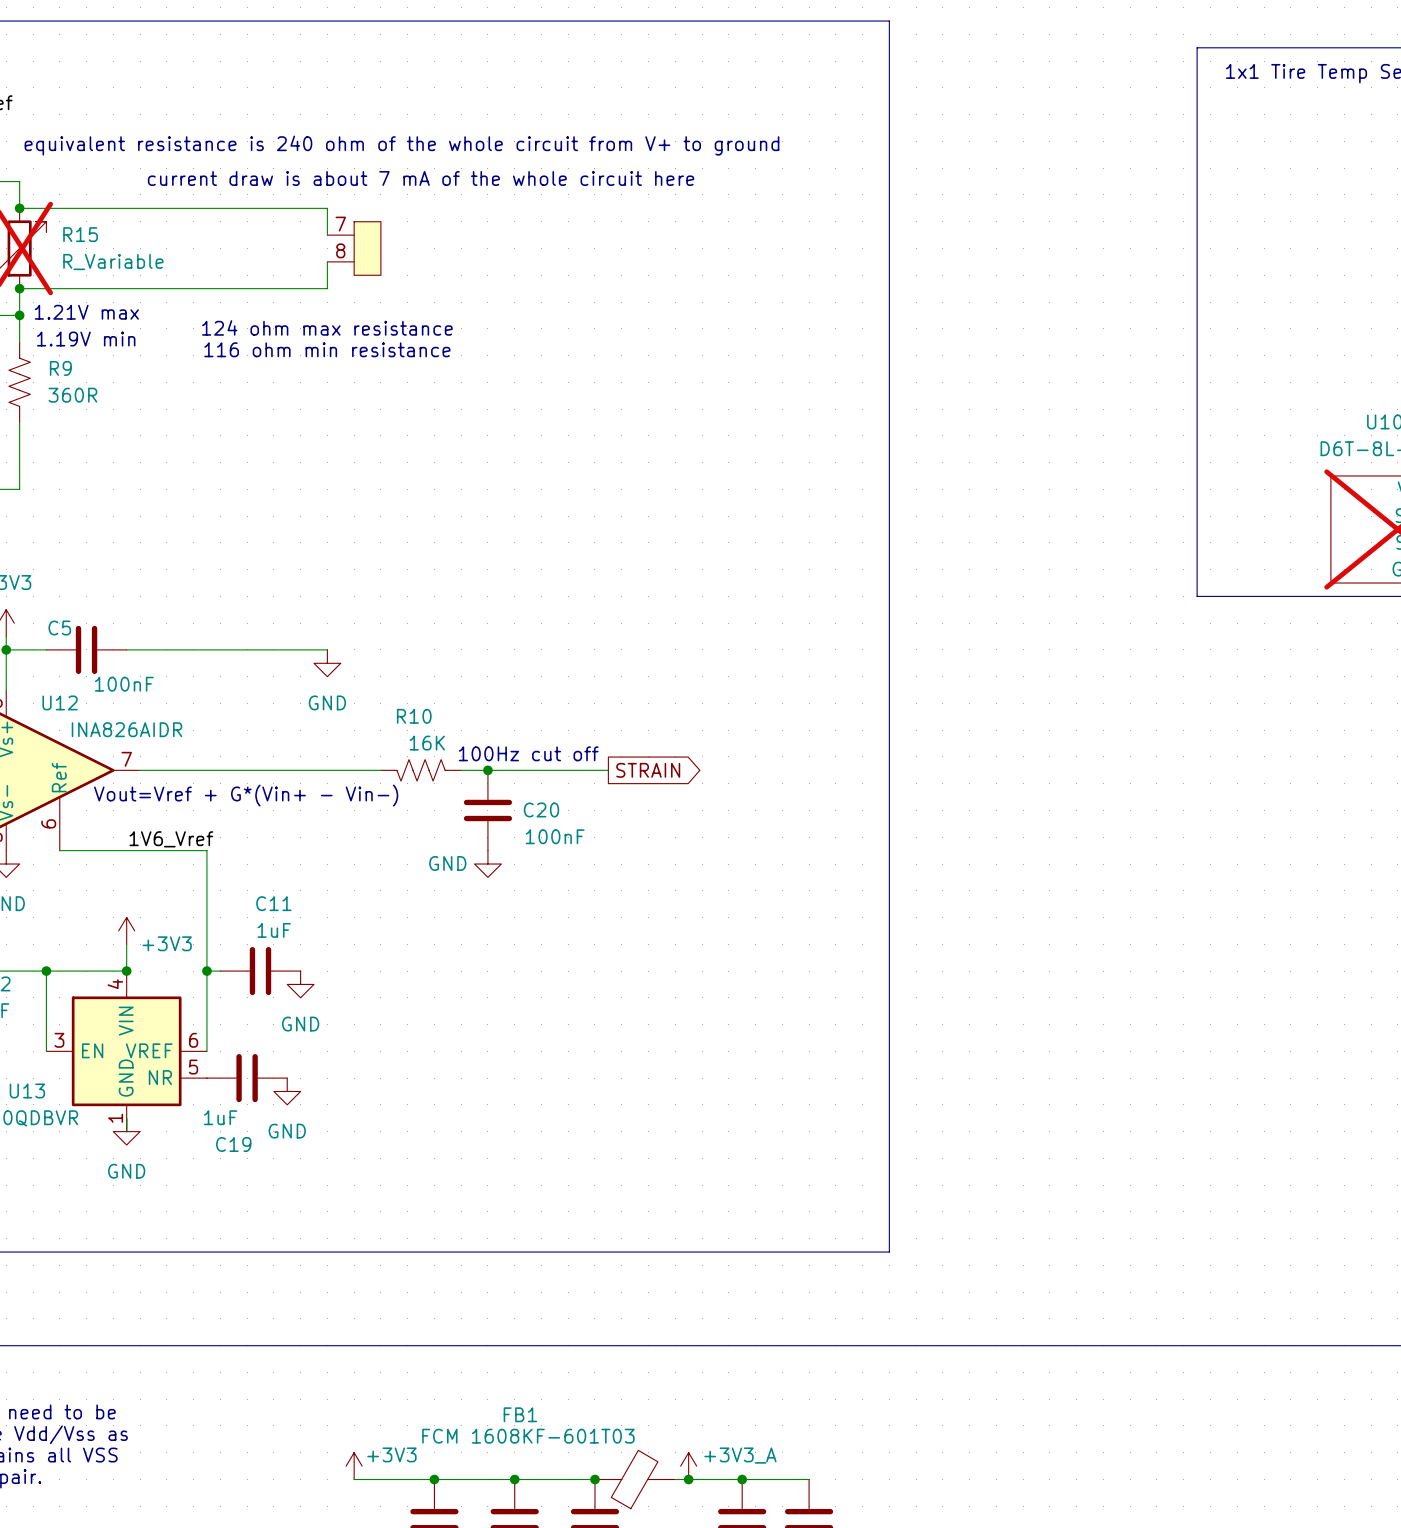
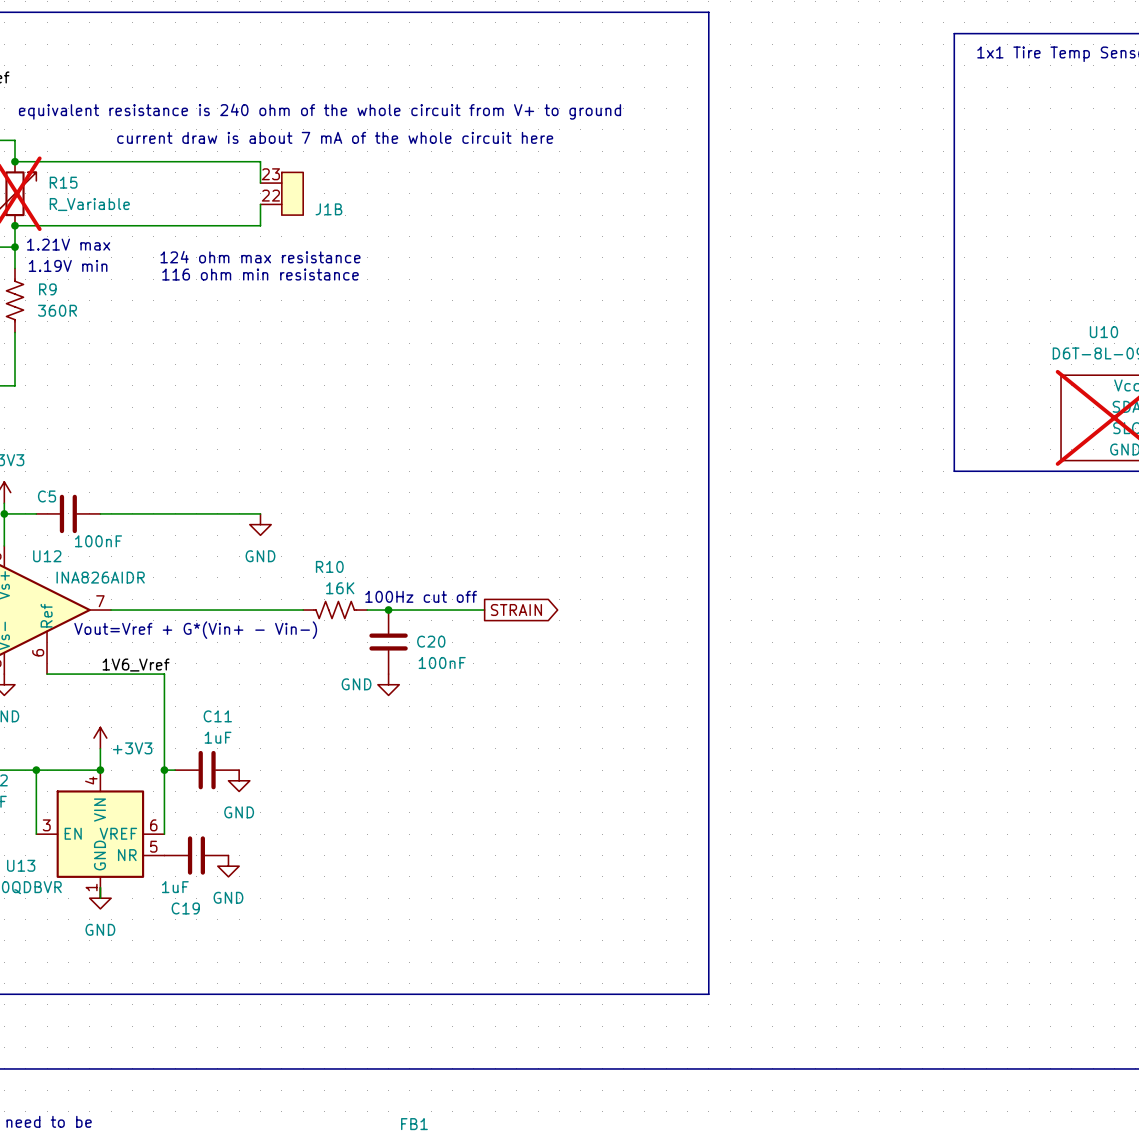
J1B pin number: 7 (340, 224) -> 23 (270, 174)
J1B pin number: 8 (340, 250) -> 22 (270, 195)
J1B name: none -> J1B (328, 209)

